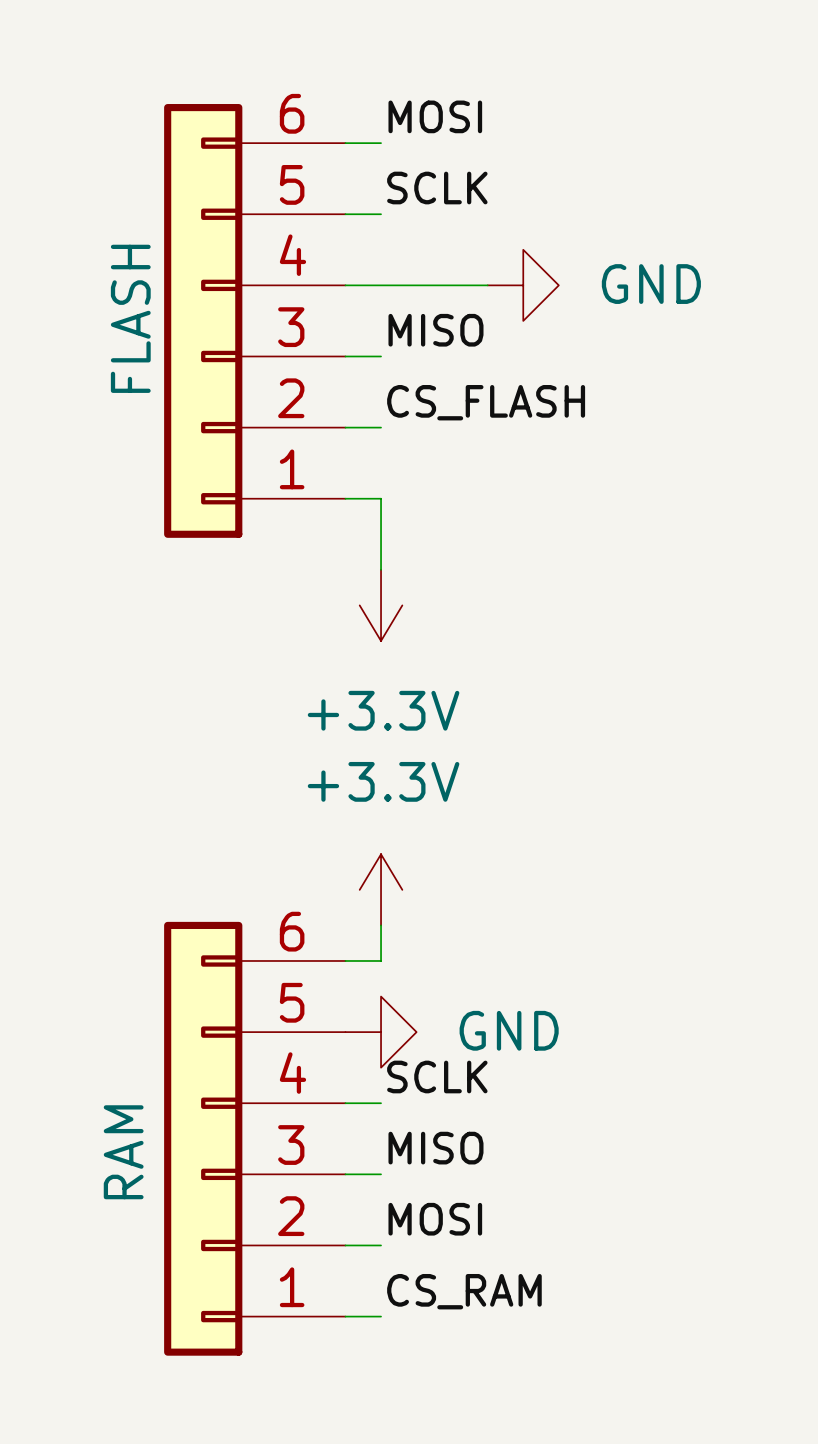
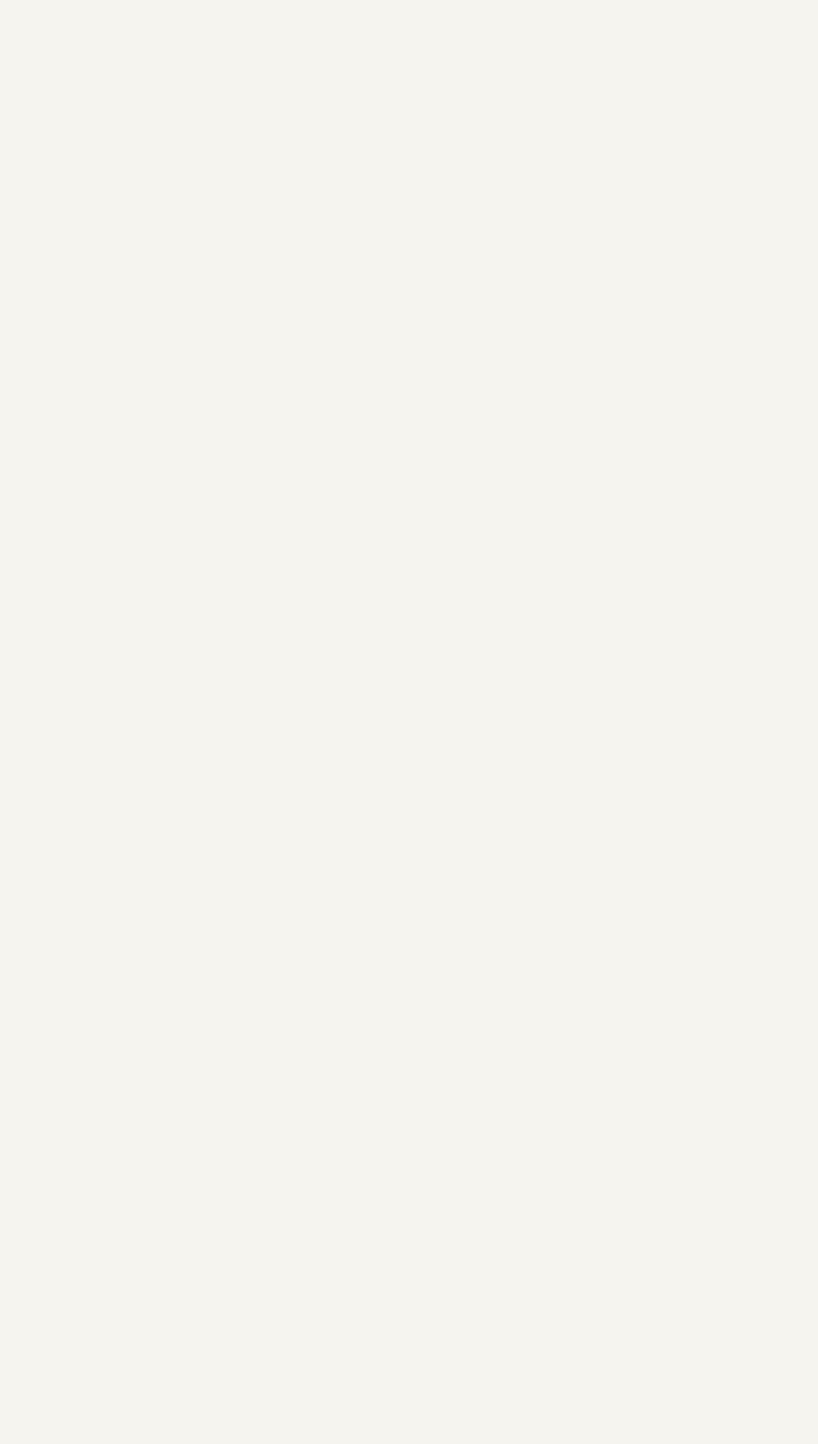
label: MOSI (435, 116) -> none
wire: (345, 143) (381, 143) -> none
label: SCLK (437, 188) -> none
wire: (345, 214) (381, 214) -> none
wire: (345, 285) (487, 285) -> none
power symbol: GND (523, 285) -> none
FLASH: (254, 320) -> none
label: MISO (435, 330) -> none
wire: (345, 356) (381, 356) -> none
label: CS_FLASH (486, 402) -> none
wire: (345, 427) (381, 427) -> none
wire: (345, 498) (381, 498) (381, 569) -> none
power symbol: +3.3V (381, 605) -> none
power symbol: +3.3V (381, 889) -> none
wire: (381, 925) (381, 960) (345, 960) -> none
power symbol: GND (381, 1032) -> none
label: SCLK (437, 1076) -> none
wire: (345, 1103) (381, 1103) -> none
RAM: (254, 1138) -> none
label: MISO (435, 1148) -> none
wire: (345, 1174) (381, 1174) -> none
label: MOSI (435, 1219) -> none
wire: (345, 1245) (381, 1245) -> none
label: CS_RAM (464, 1291) -> none
wire: (345, 1316) (381, 1316) -> none

